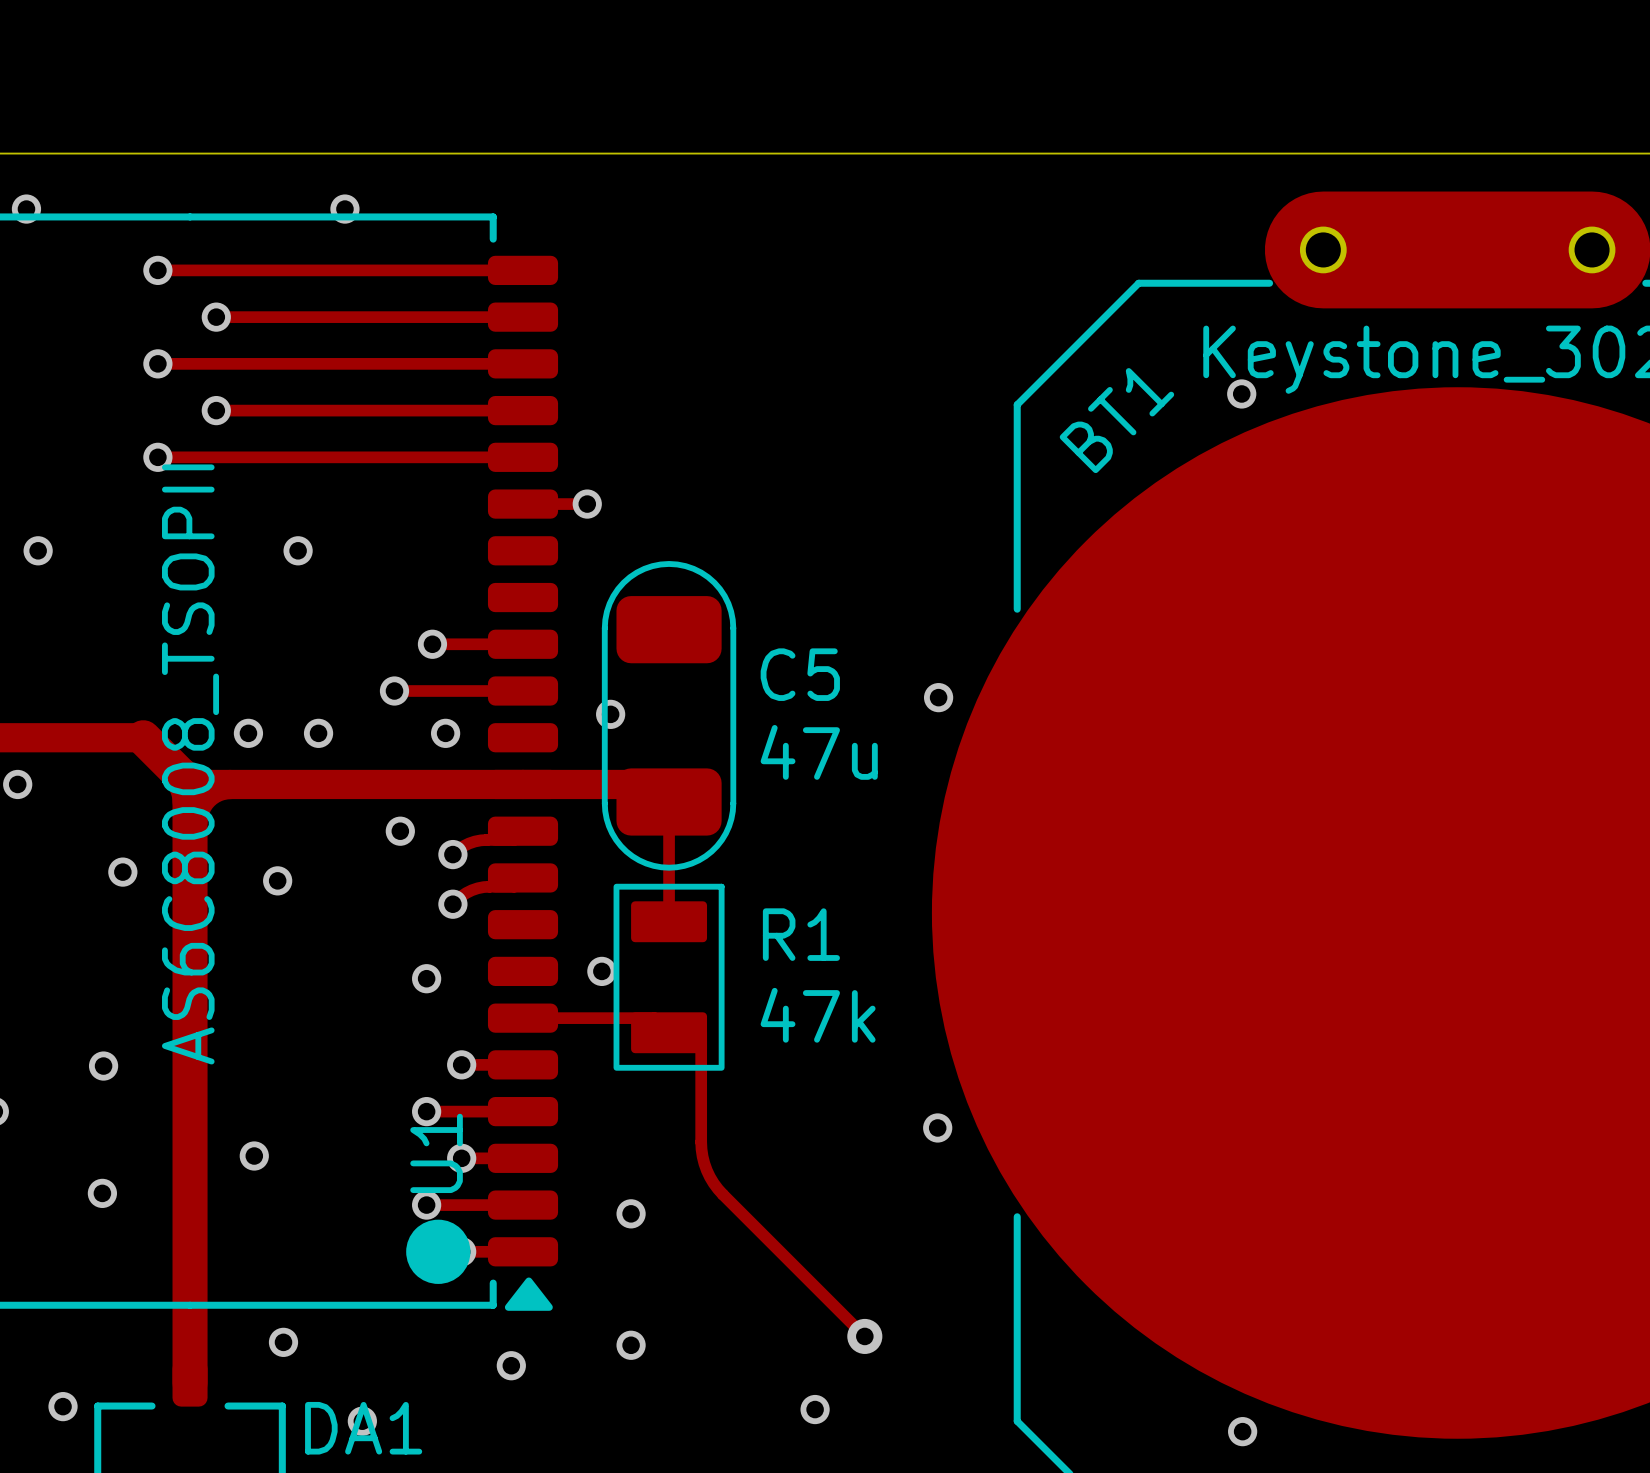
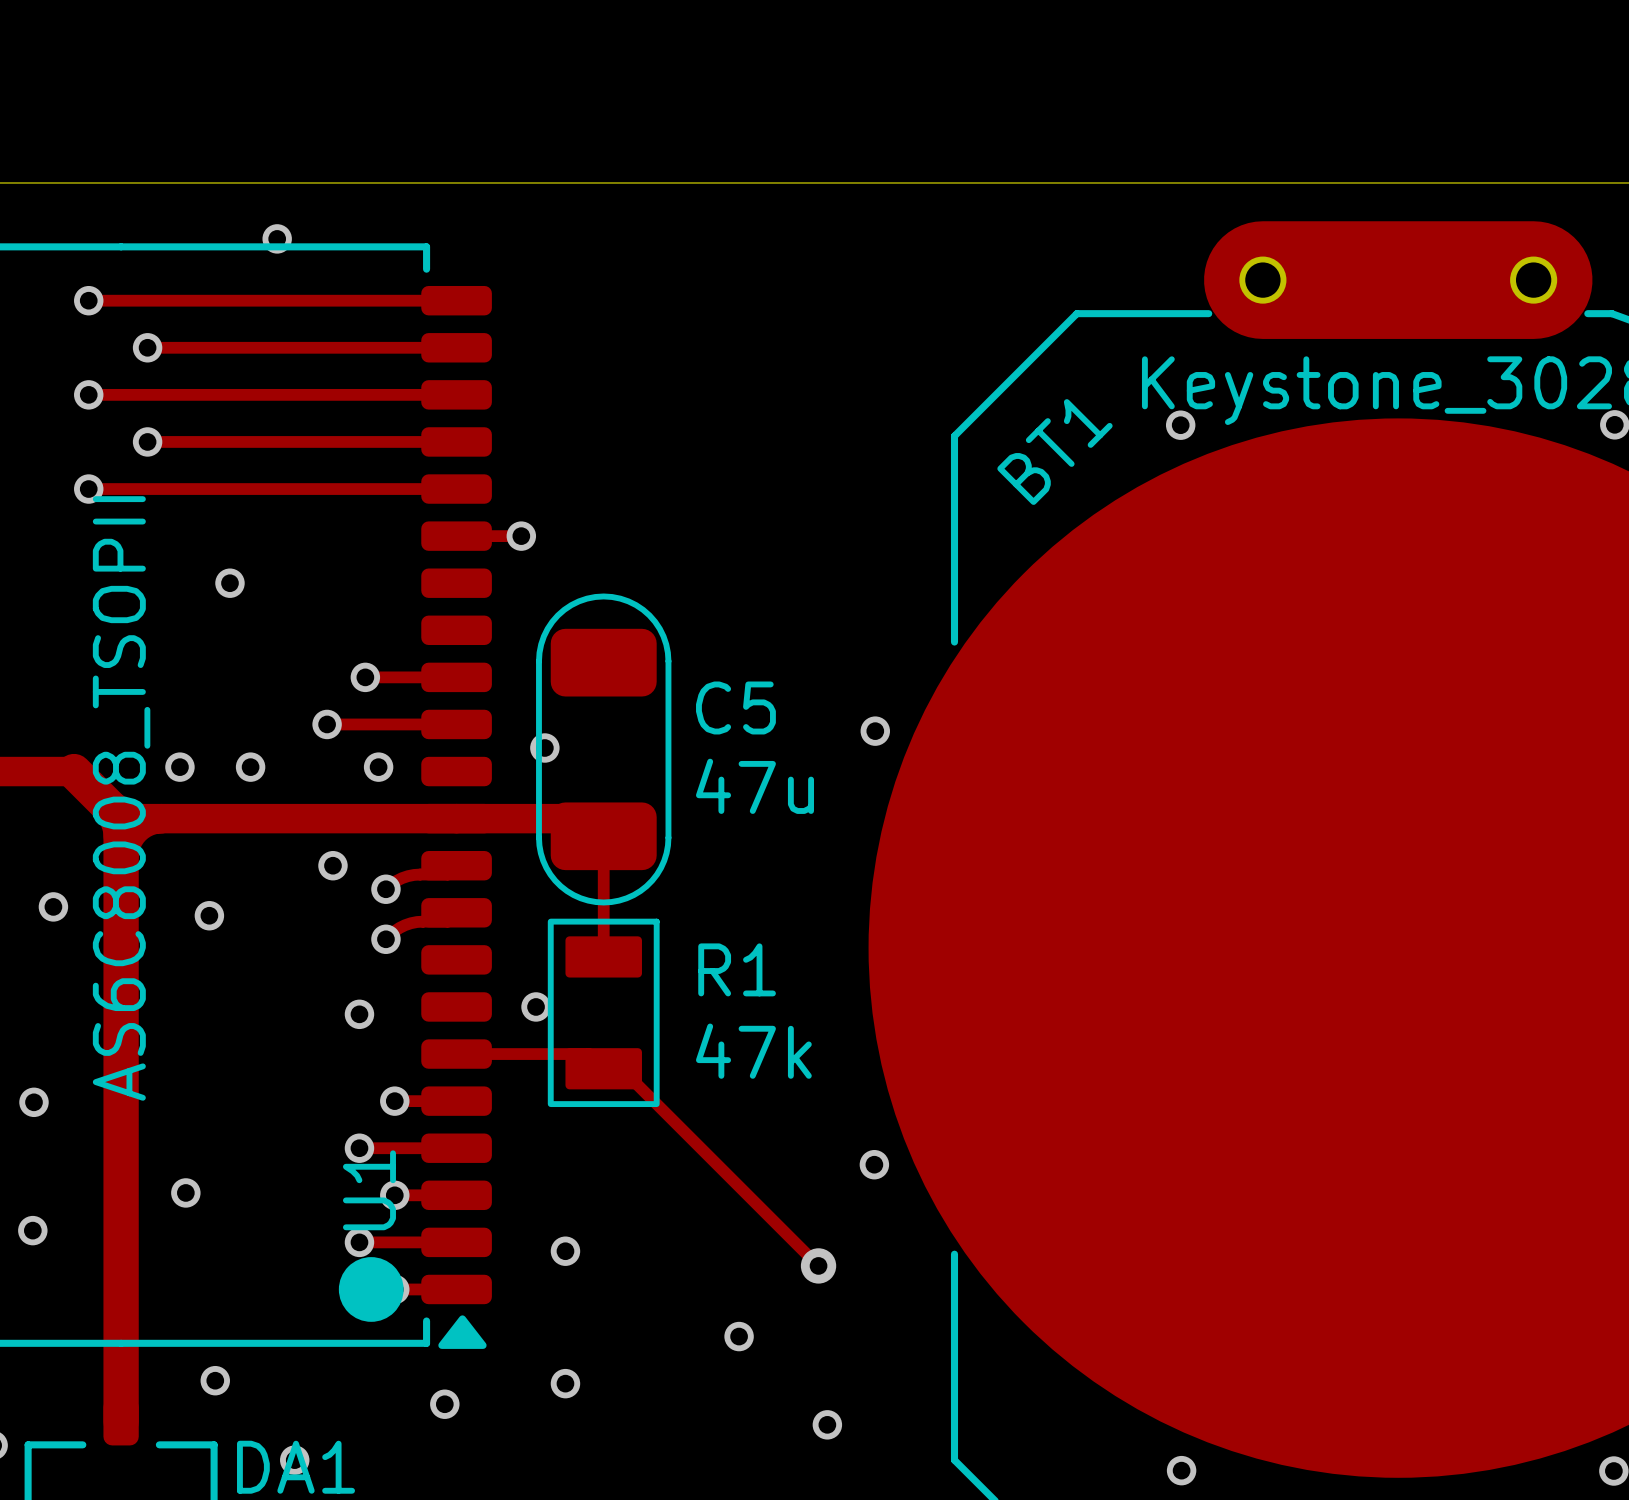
track: (686, 1032) (701, 1032) (701, 1149) (709, 1177) (722, 1194) (864, 1336) -> (621, 1068) (818, 1265)
via: none -> (739, 1336)
via position: (864, 1336) -> (818, 1265)
via: none -> (827, 1424)
via: (815, 1409) -> none

